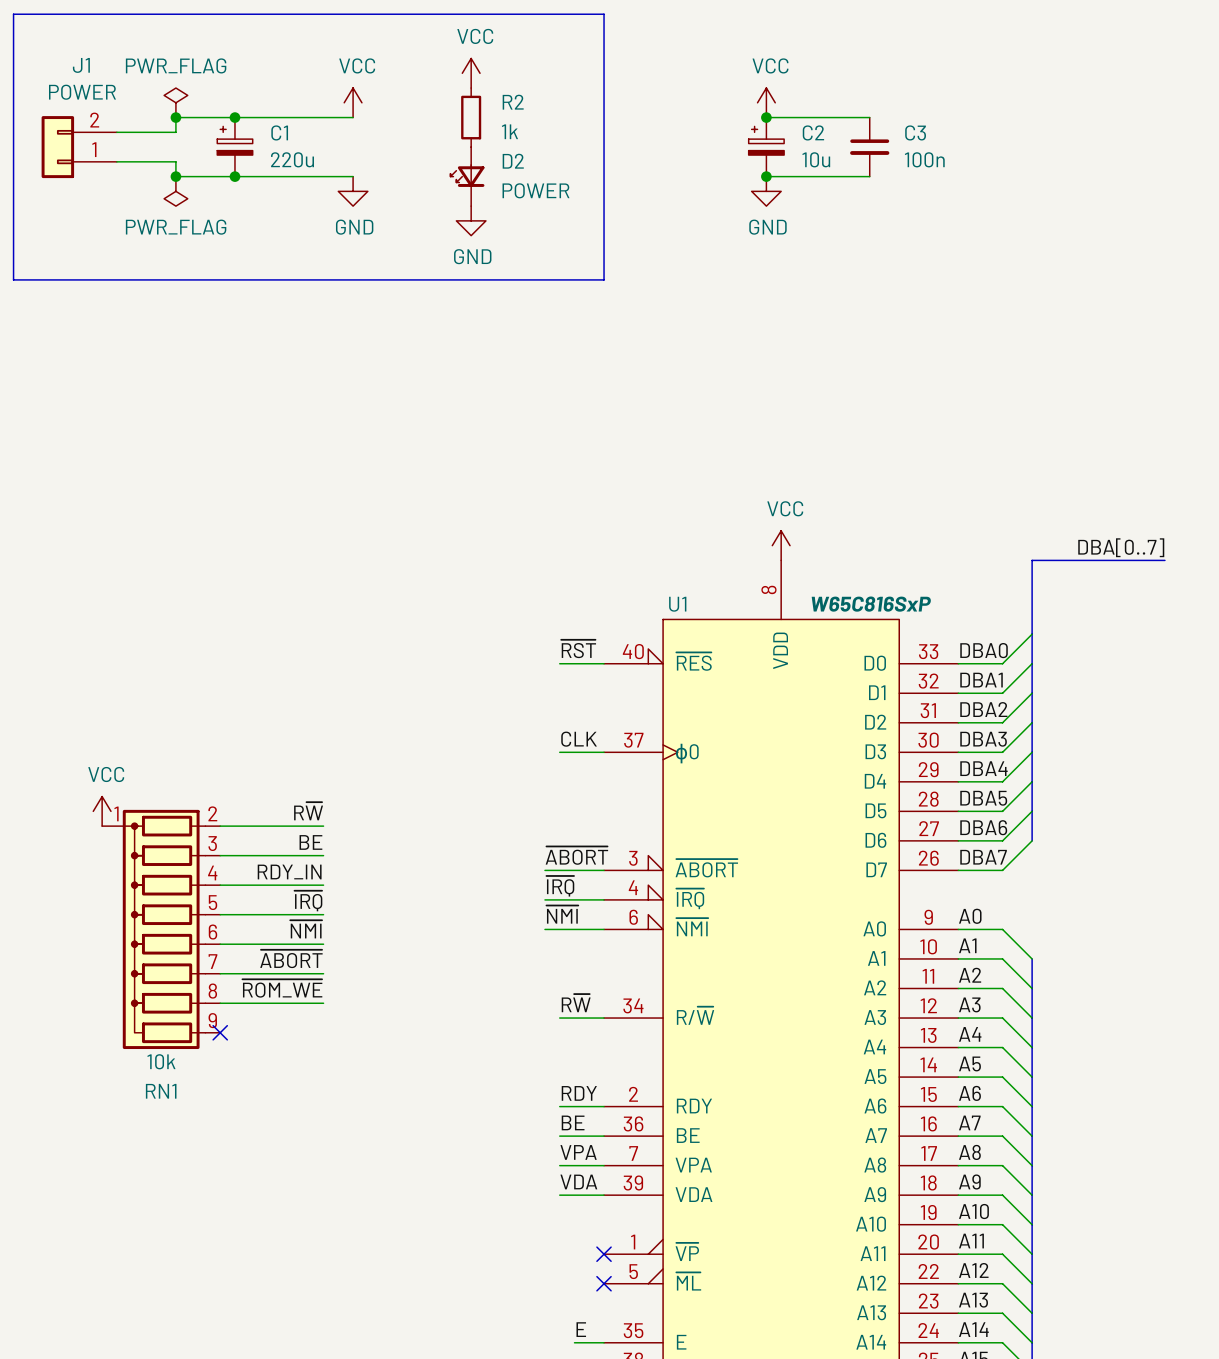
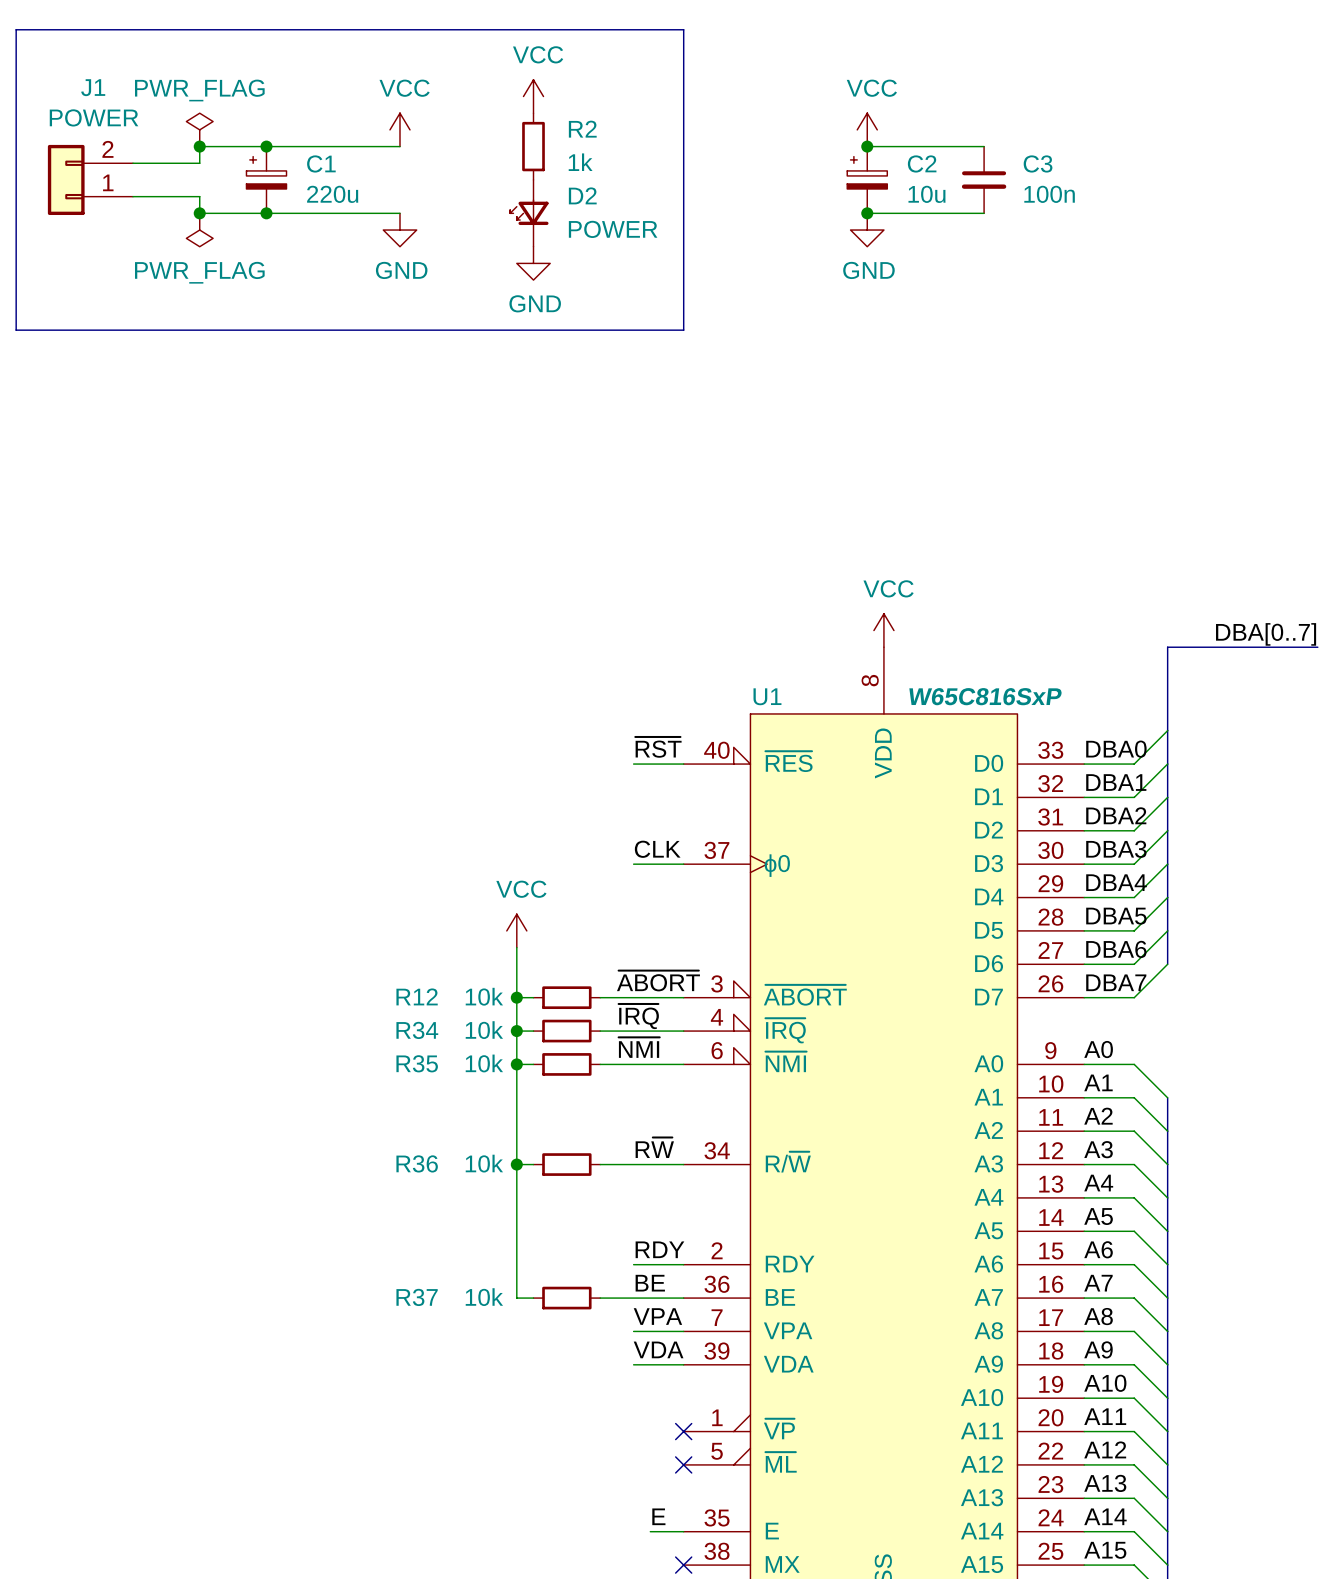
power symbol: VCC (102, 811) -> none
label: R~{W} (308, 811) -> none
power symbol: none -> VCC (516, 930)
wire: (220, 826) (323, 826) -> none
wire: none -> (516, 947) (516, 1298) (533, 1298)
label: BE (310, 842) -> none
wire: (220, 855) (323, 855) -> none
wire: none -> (516, 997) (533, 997)
junction: none -> (516, 997)
R12: none -> 10k (566, 997)
wire: none -> (600, 997) (616, 997)
label: RDY_IN (289, 871) -> none
wire: (220, 885) (323, 885) -> none
wire: none -> (516, 1031) (533, 1031)
junction: none -> (516, 1031)
R34: none -> 10k (566, 1031)
wire: none -> (600, 1031) (616, 1031)
label: ~{IRQ} (308, 901) -> none
wire: (220, 914) (323, 914) -> none
RN1: 10k (161, 929) -> none
label: ~{NMI} (306, 929) -> none
wire: none -> (516, 1064) (533, 1064)
junction: none -> (516, 1064)
R35: none -> 10k (566, 1064)
wire: none -> (600, 1064) (616, 1064)
wire: (220, 944) (323, 944) -> none
label: ~{ABORT} (291, 958) -> none
wire: (220, 973) (323, 973) -> none
label: ~{ROM_WE} (282, 988) -> none
wire: (220, 1003) (323, 1003) -> none
wire: none -> (516, 1164) (533, 1164)
junction: none -> (516, 1164)
R36: none -> 10k (566, 1164)
wire: none -> (600, 1164) (633, 1164)
no-connect mark: (220, 1032) -> none
R37: none -> 10k (566, 1298)
wire: none -> (600, 1298) (633, 1298)

